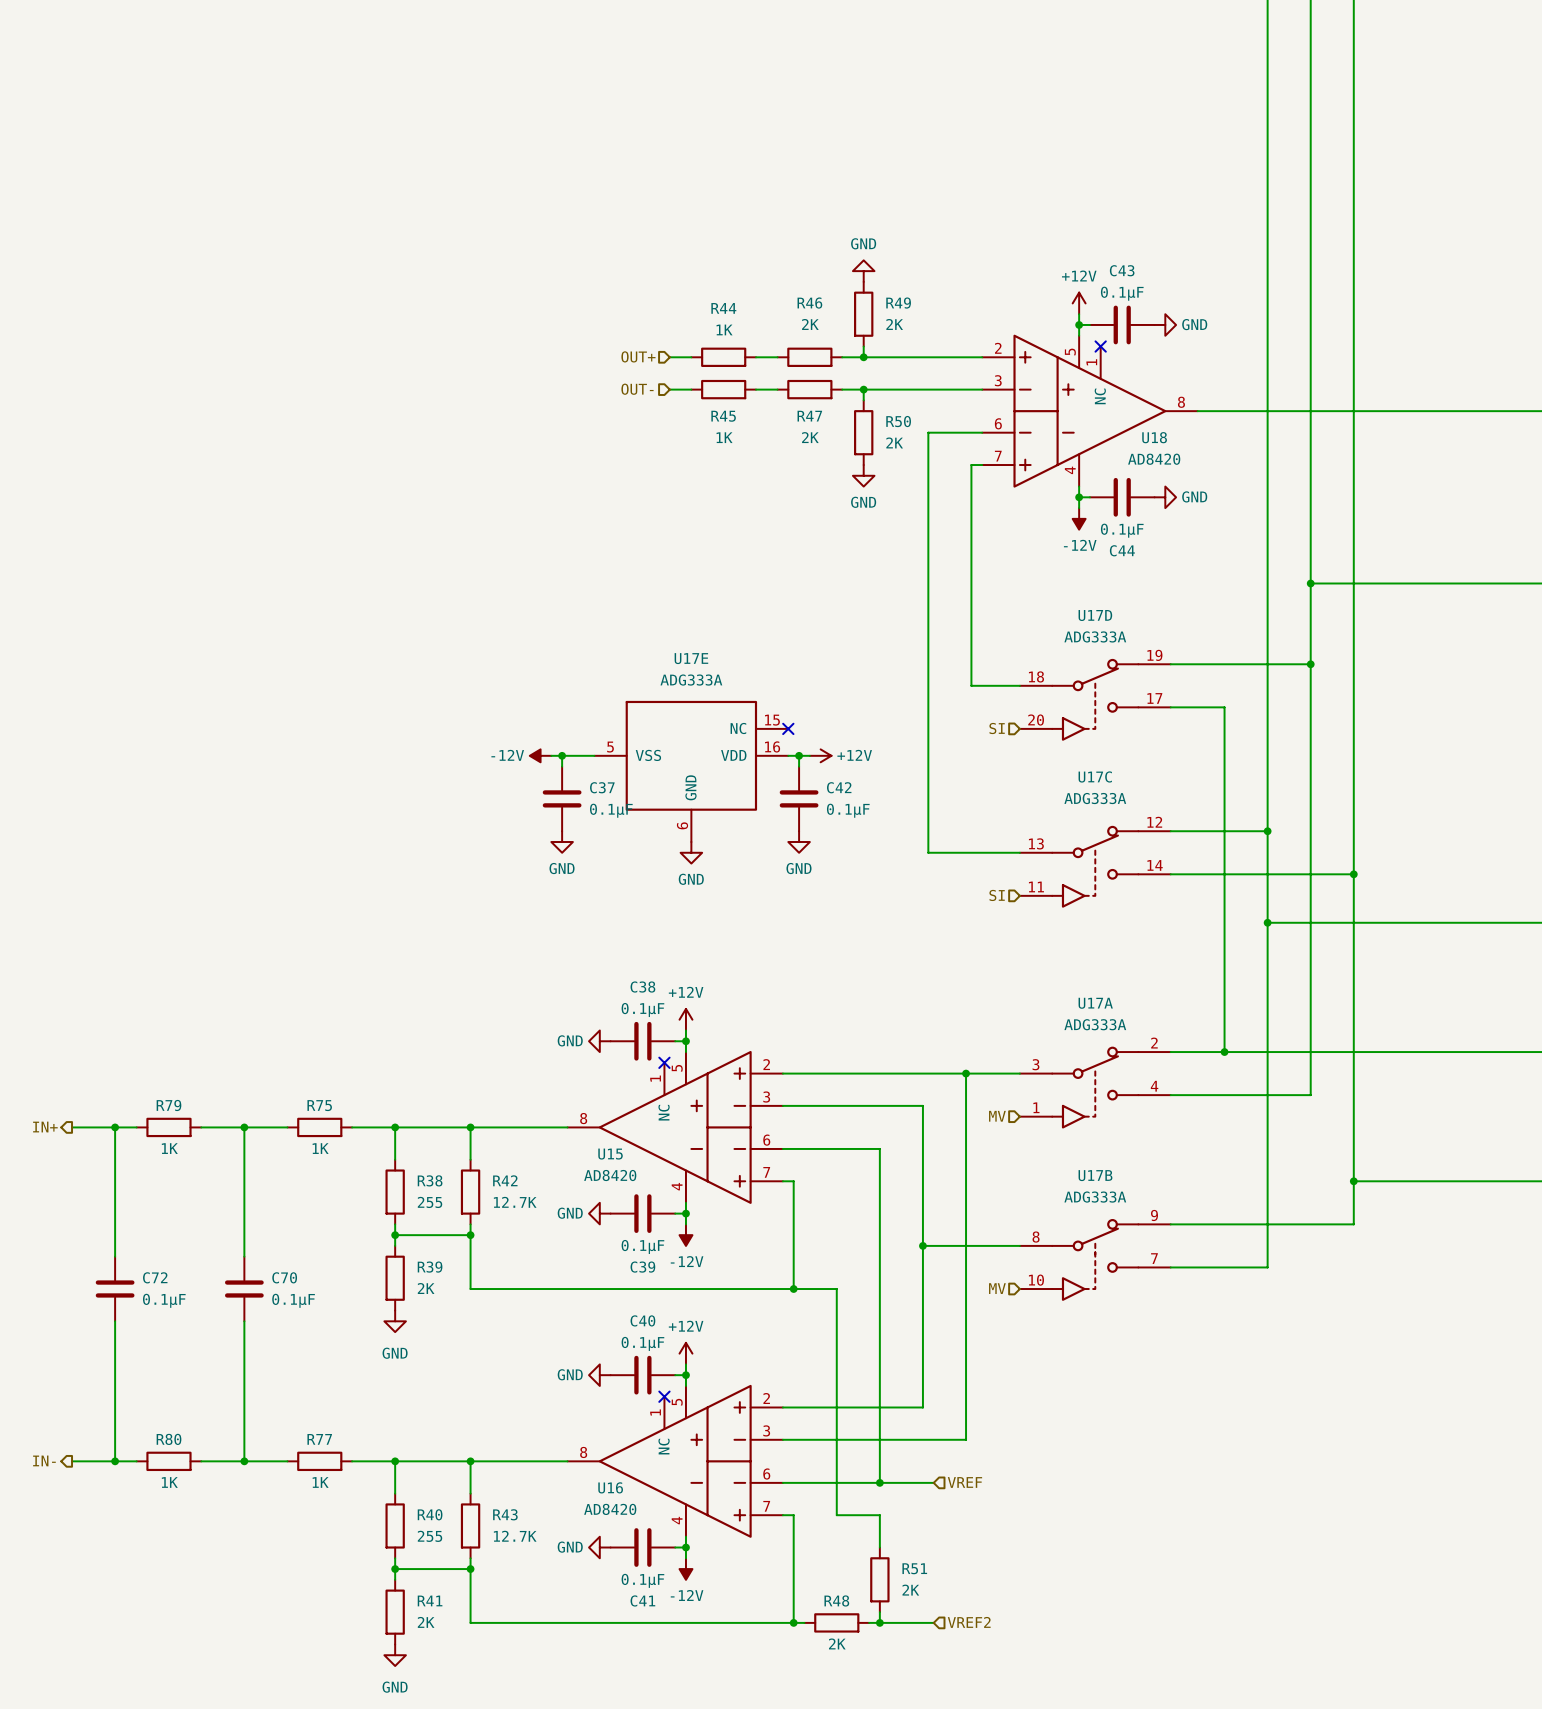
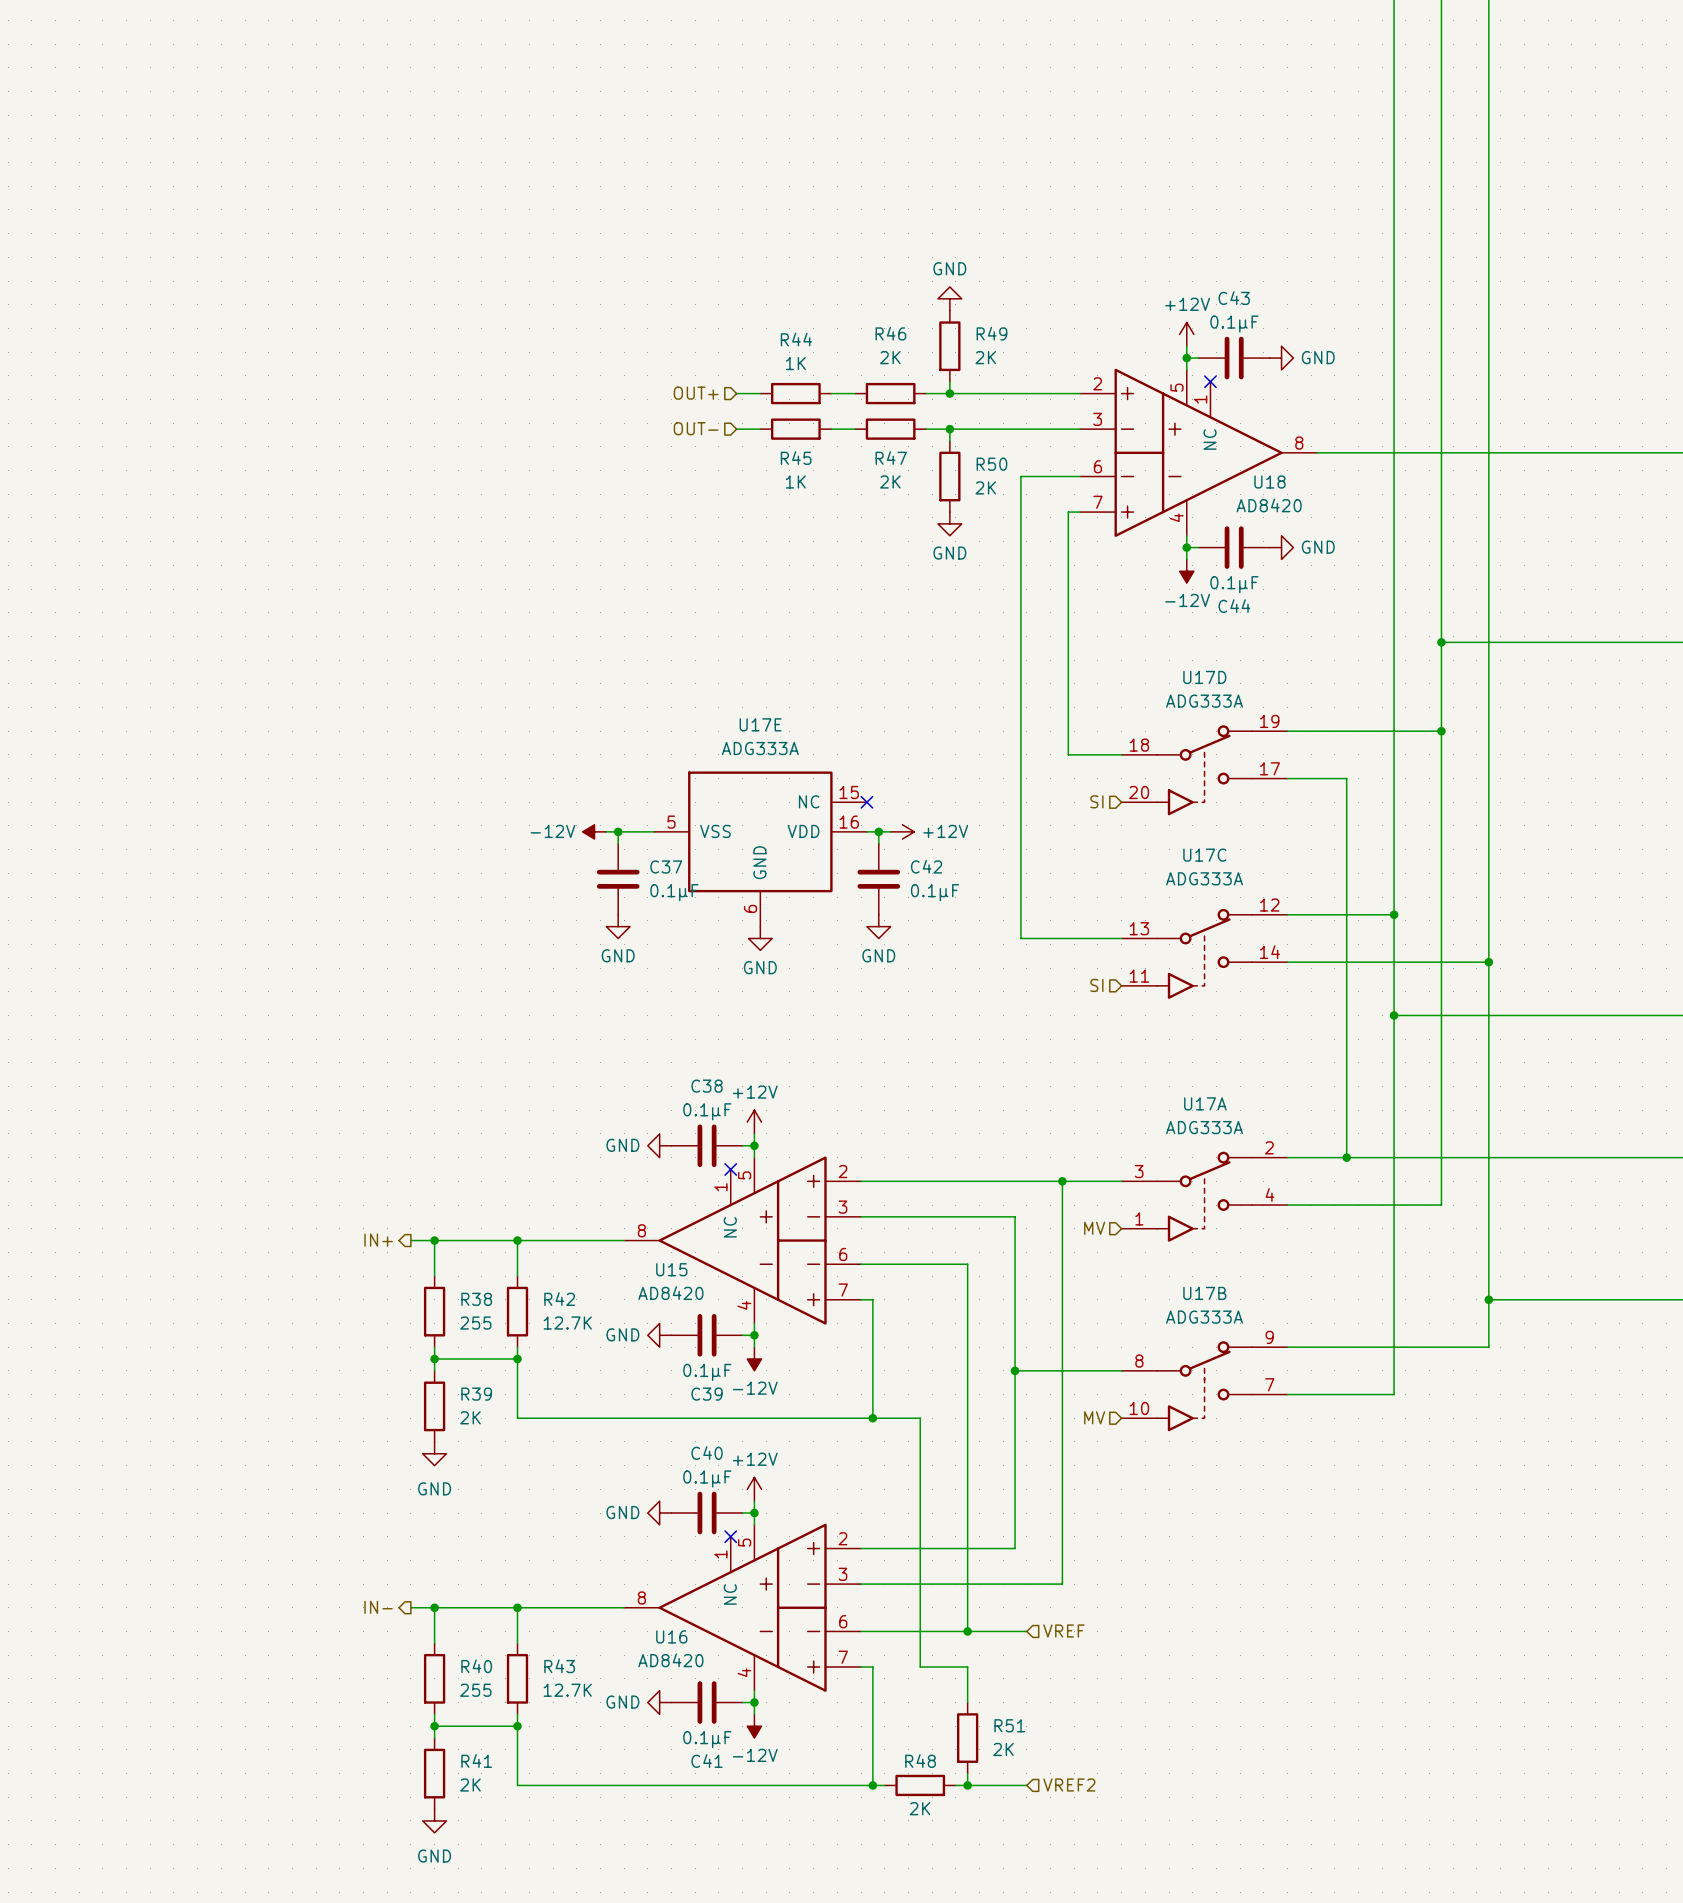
hierarchical label: IN+ (45, 1127) -> none
wire: (72, 1127) (136, 1127) -> none
wire: (115, 1127) (115, 1256) -> none
junction: (115, 1127) -> none
R79: 1K (168, 1127) -> none
wire: (201, 1127) (287, 1127) -> none
wire: (244, 1127) (244, 1256) -> none
junction: (244, 1127) -> none
R75: 1K (319, 1127) -> none
hierarchical label: none -> IN+ (378, 1240)
C72: 0.1µF (115, 1289) -> none
C70: 0.1µF (244, 1289) -> none
wire: (115, 1321) (115, 1461) -> none
wire: (244, 1321) (244, 1461) -> none
hierarchical label: IN- (44, 1460) -> none
hierarchical label: none -> IN- (378, 1607)
wire: (72, 1461) (136, 1461) -> none
junction: (115, 1461) -> none
R80: 1K (168, 1461) -> none
wire: (201, 1461) (287, 1461) -> none
junction: (244, 1461) -> none
R77: 1K (319, 1461) -> none
wire: (352, 1461) (373, 1461) -> none

